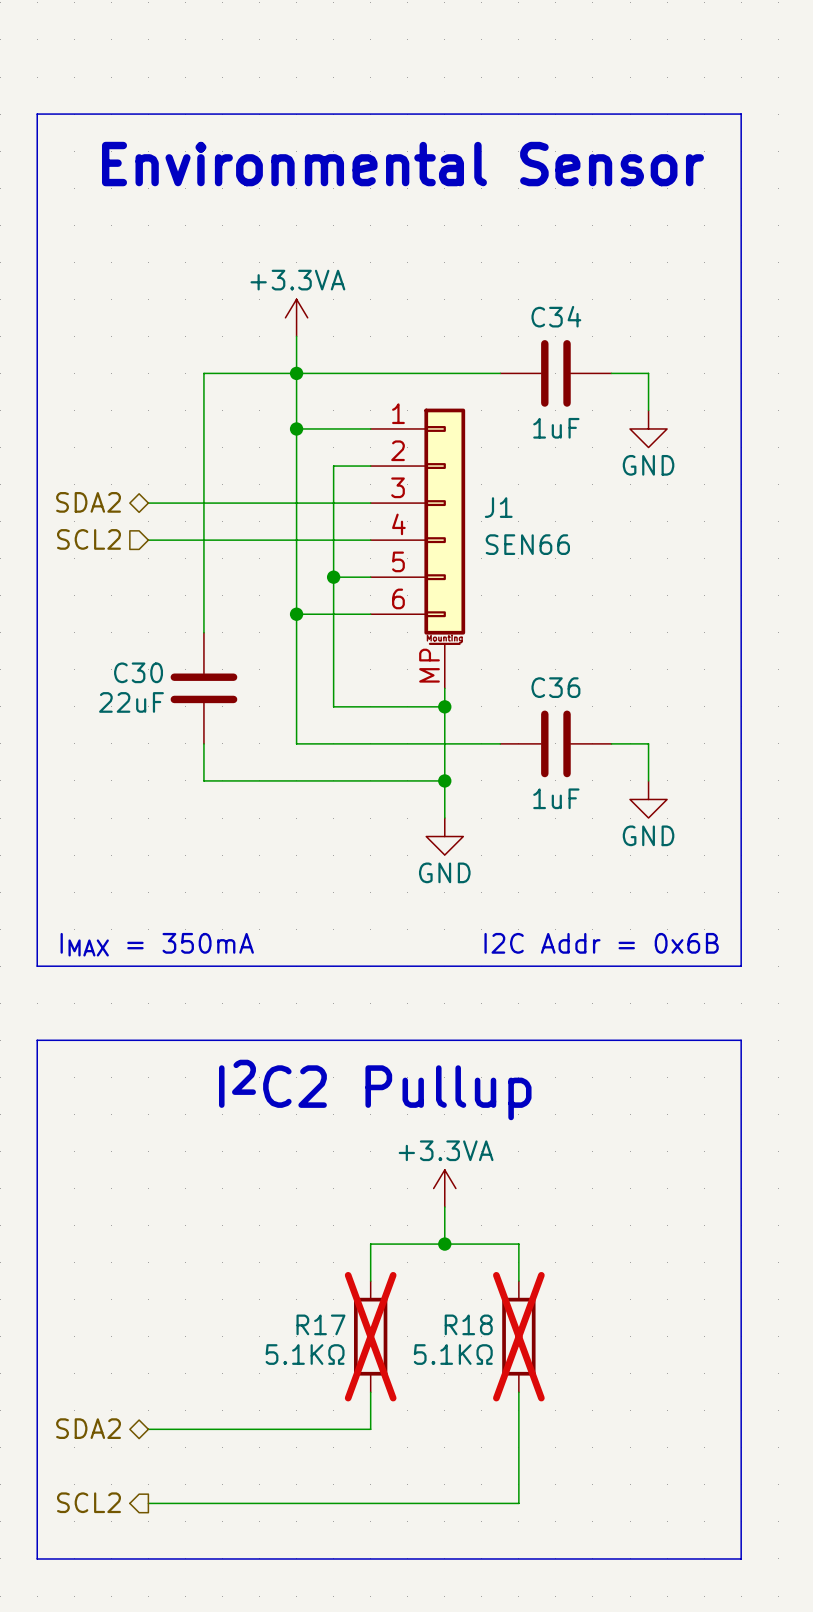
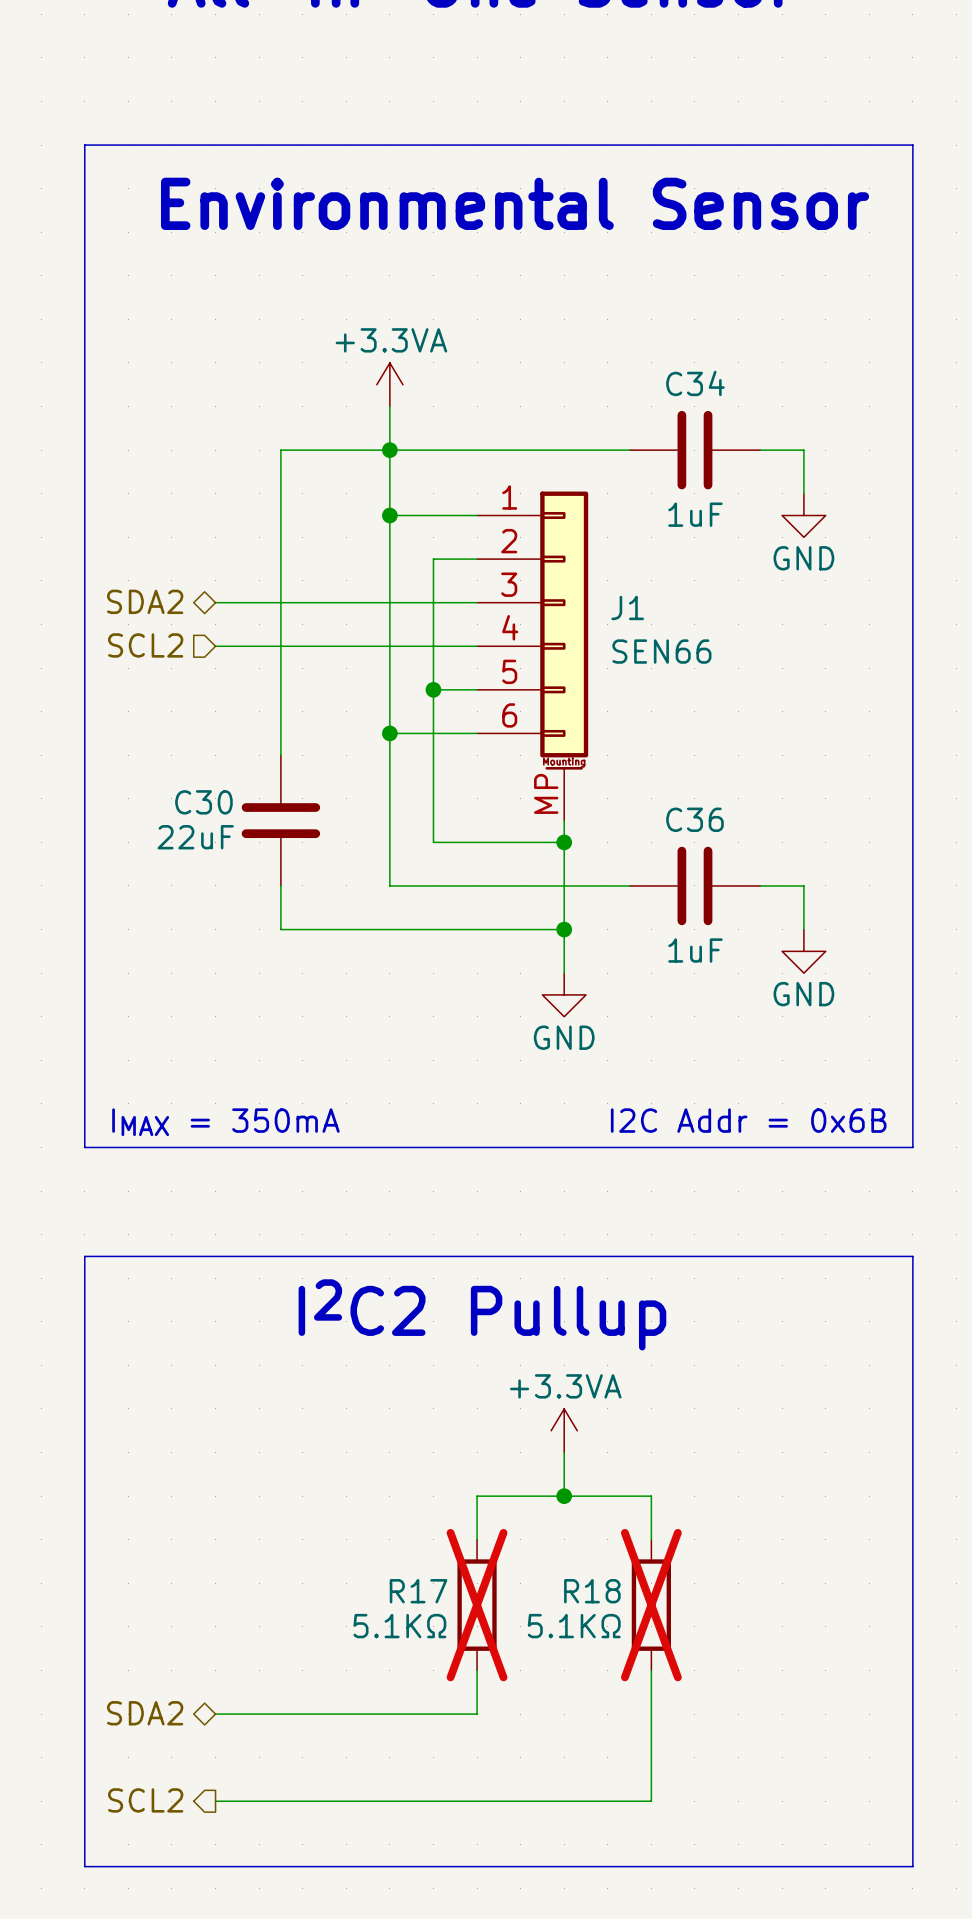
line: (37, 1058) (37, 1040) (741, 1040) (741, 1058) -> (84, 1256) (912, 1256)
text position: I2C2 Pullup (375, 1089) -> I2C2 Pullup (482, 1314)
power symbol position: +3.3VA (444, 1188) -> +3.3VA (564, 1430)
junction position: (444, 1244) -> (564, 1496)
wire: (370, 1262) (370, 1244) (518, 1244) (518, 1262) -> (477, 1496) (651, 1496)
R17 position: (370, 1336) -> (477, 1605)
R18 position: (518, 1336) -> (651, 1605)
hierarchical label position: SDA2 (88, 1428) -> SDA2 (145, 1713)
wire: (148, 1429) (370, 1429) -> (215, 1714) (477, 1714) (477, 1692)
hierarchical label position: SCL2 (88, 1502) -> SCL2 (145, 1800)
wire: (148, 1503) (518, 1503) -> (215, 1801) (651, 1801) (651, 1779)
line: (37, 1558) (741, 1558) -> (84, 1844) (84, 1866) (912, 1866) (912, 1844)

